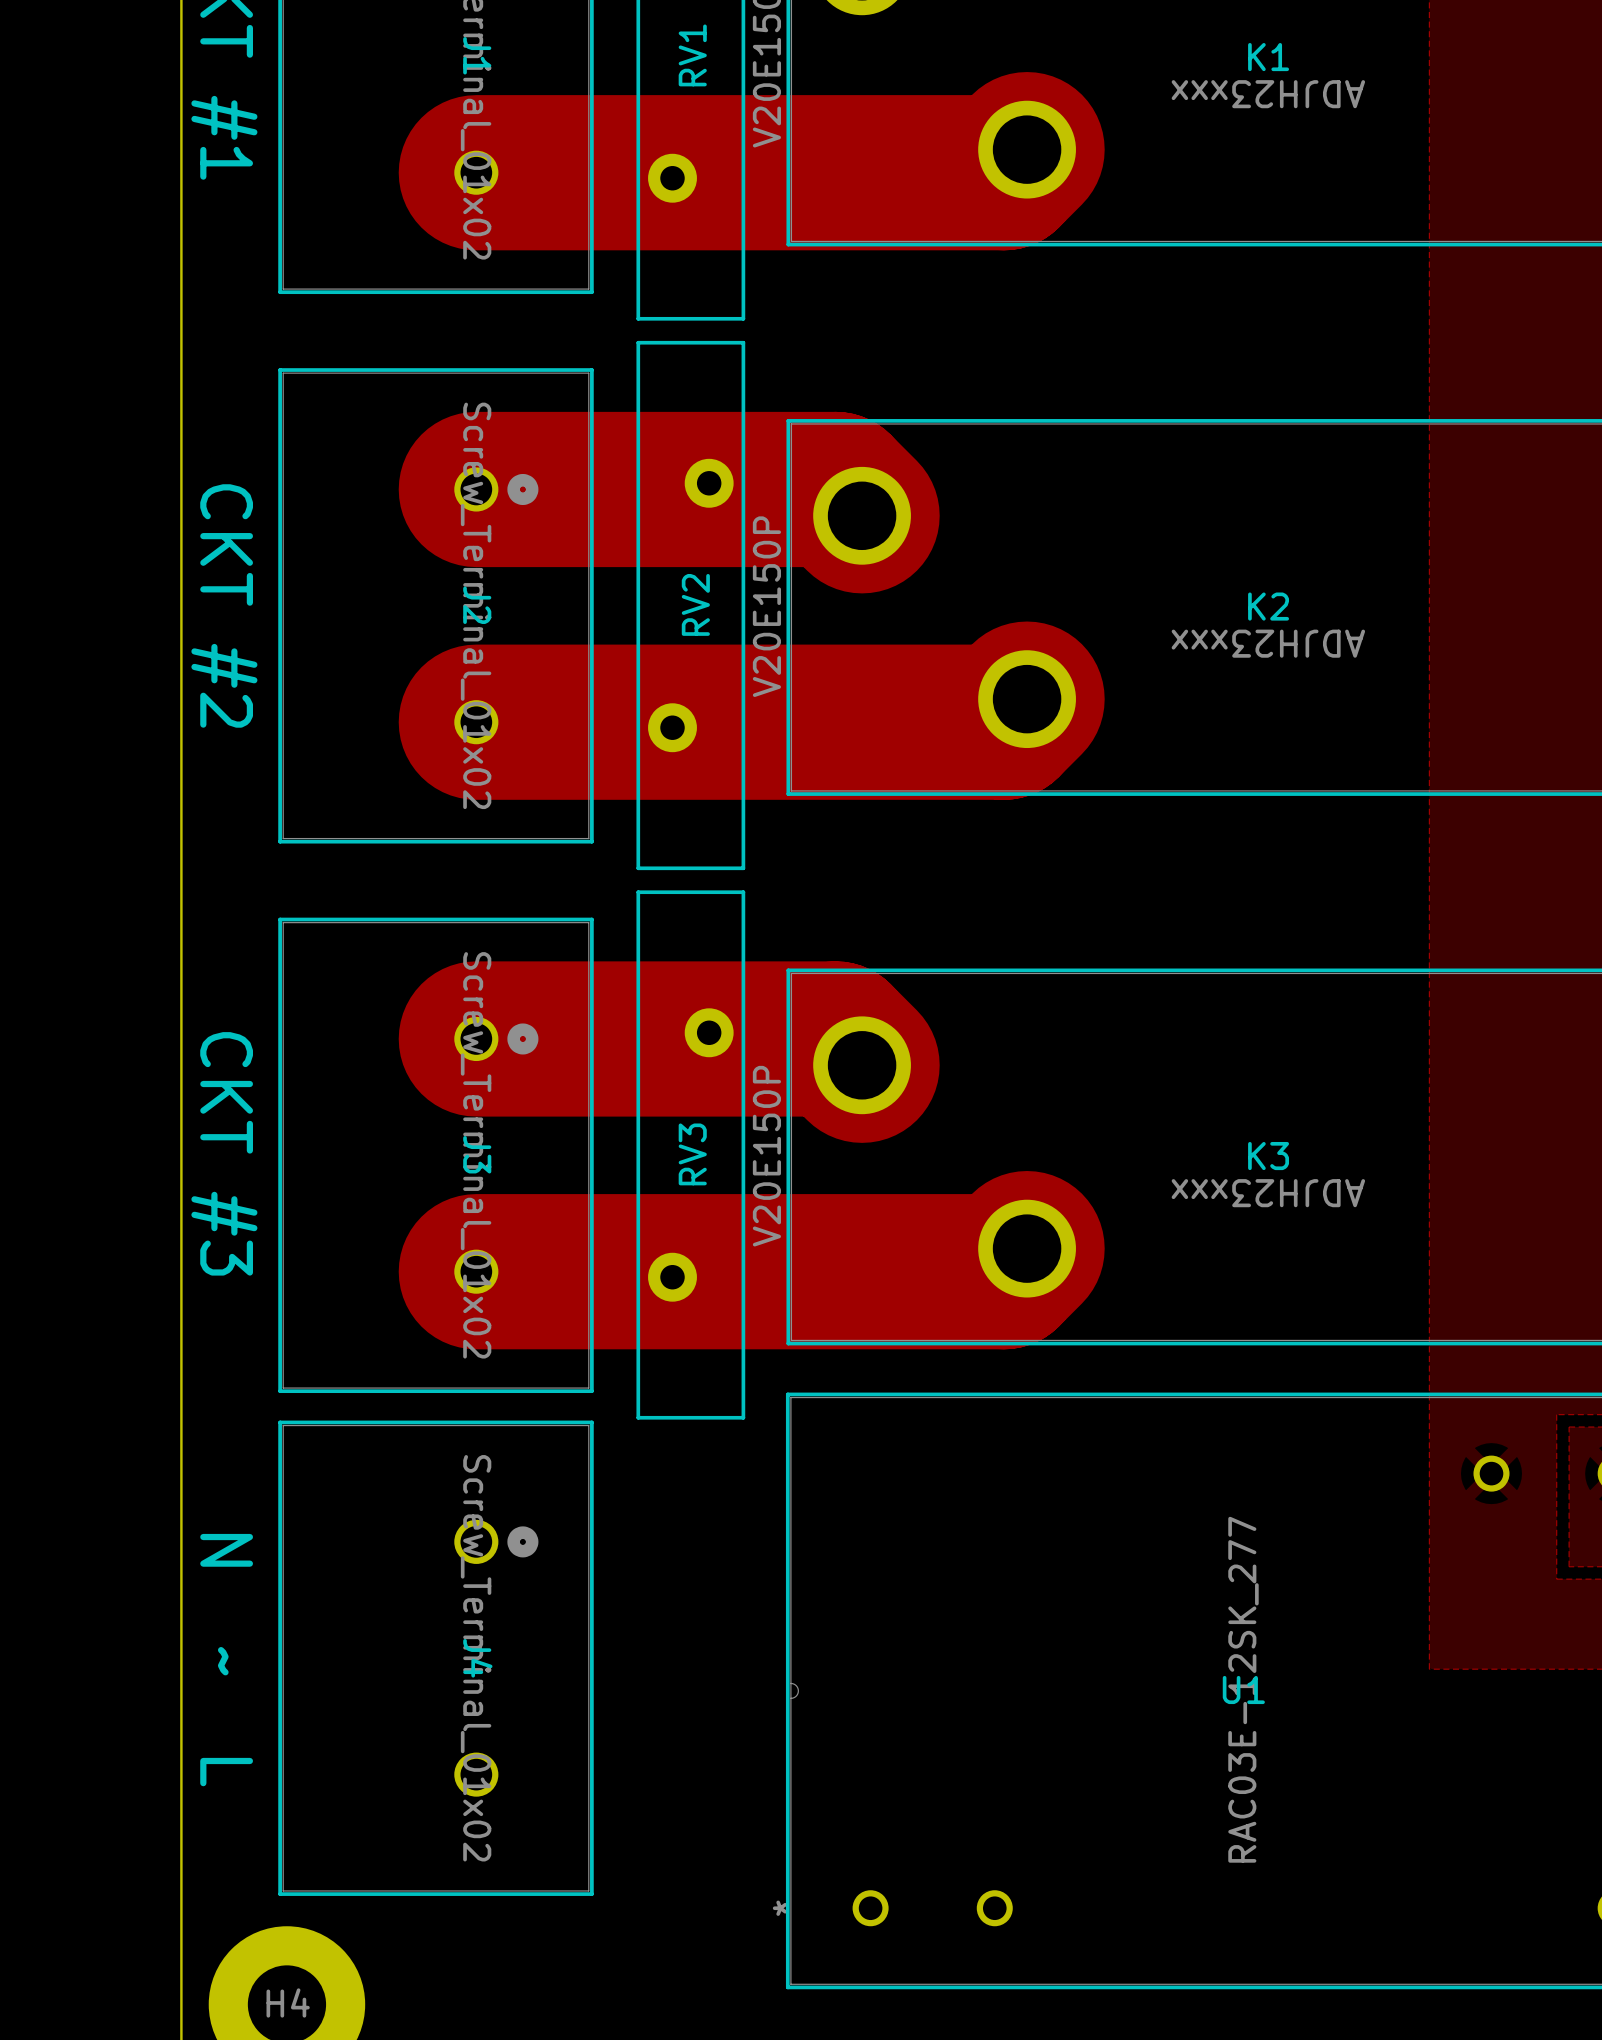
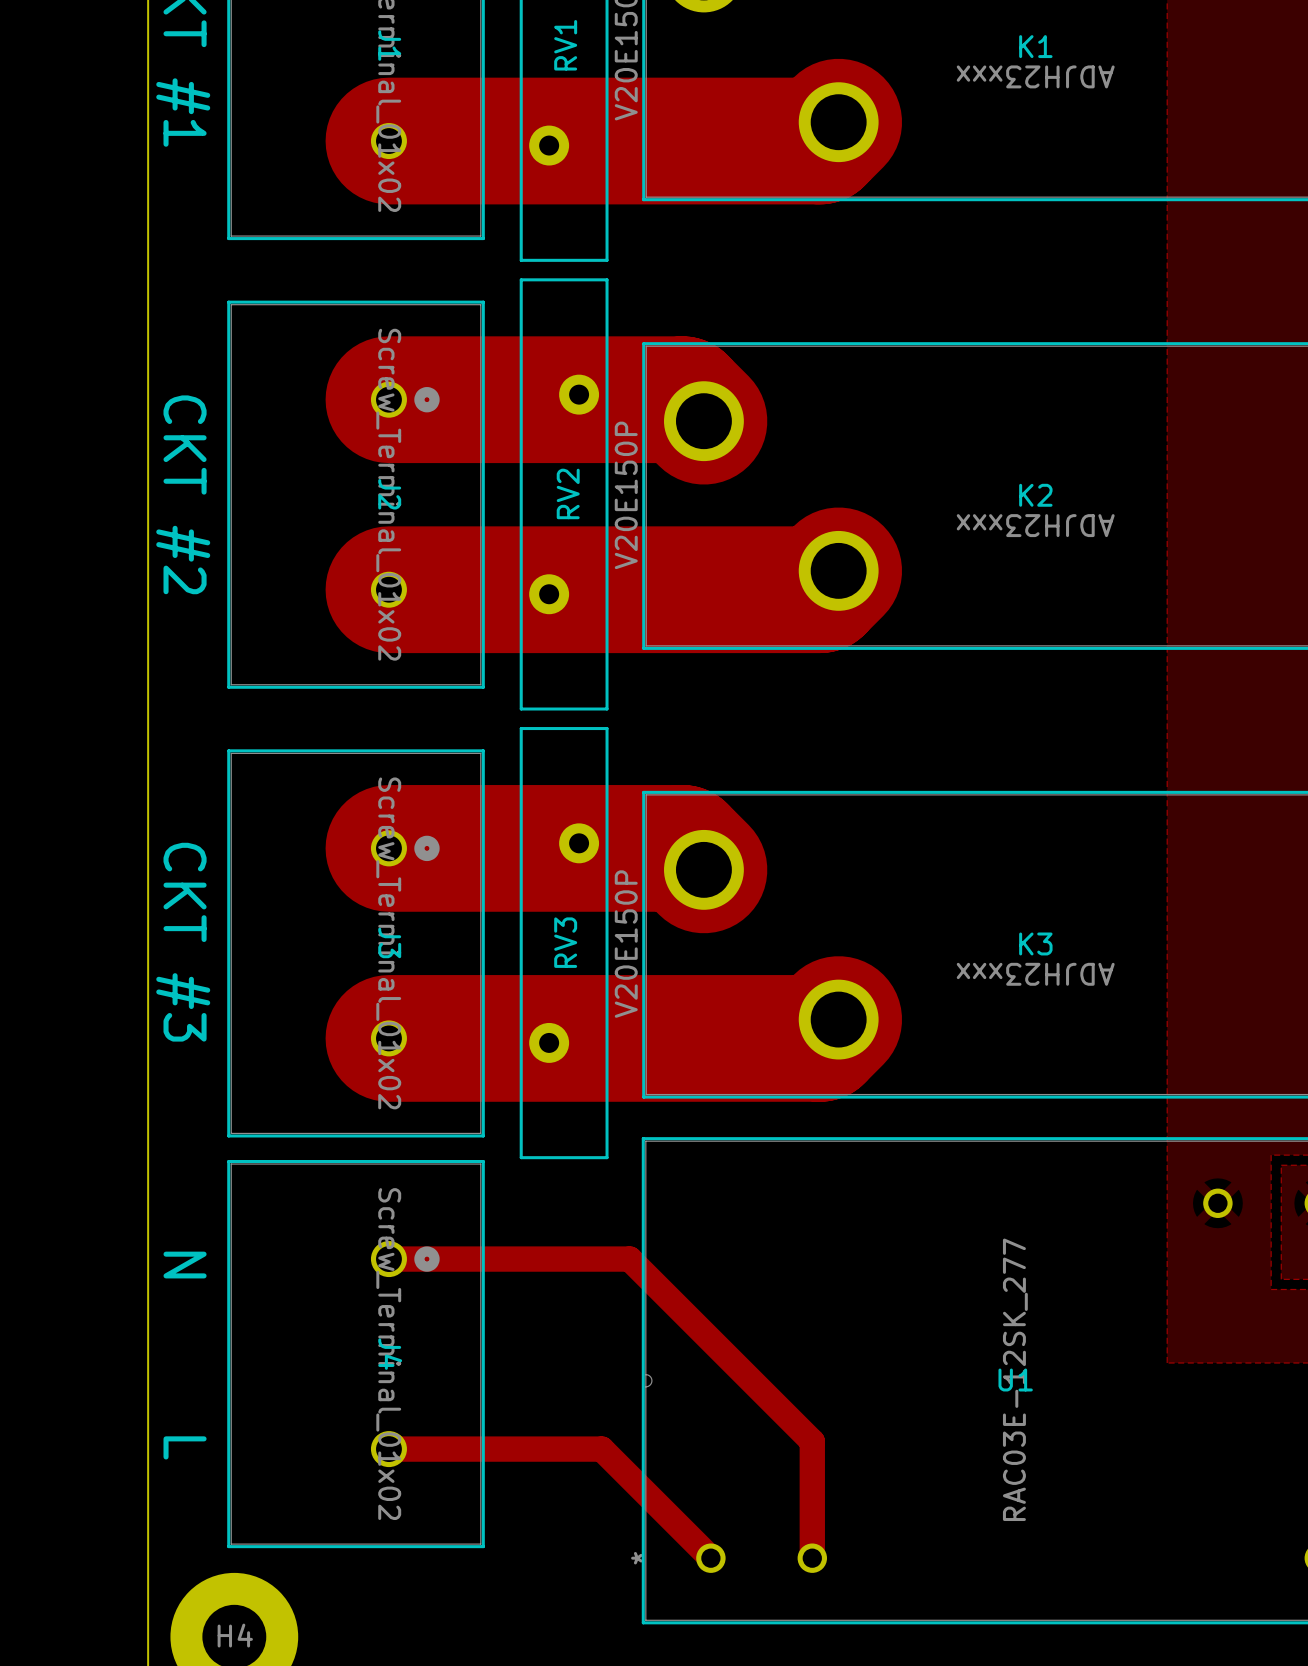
track: none -> (388, 1259) (629, 1259) (812, 1441) (812, 1558)
text: N ~ L (226, 1660) -> N L (185, 1355)
track: none -> (388, 1449) (601, 1449) (710, 1558)

